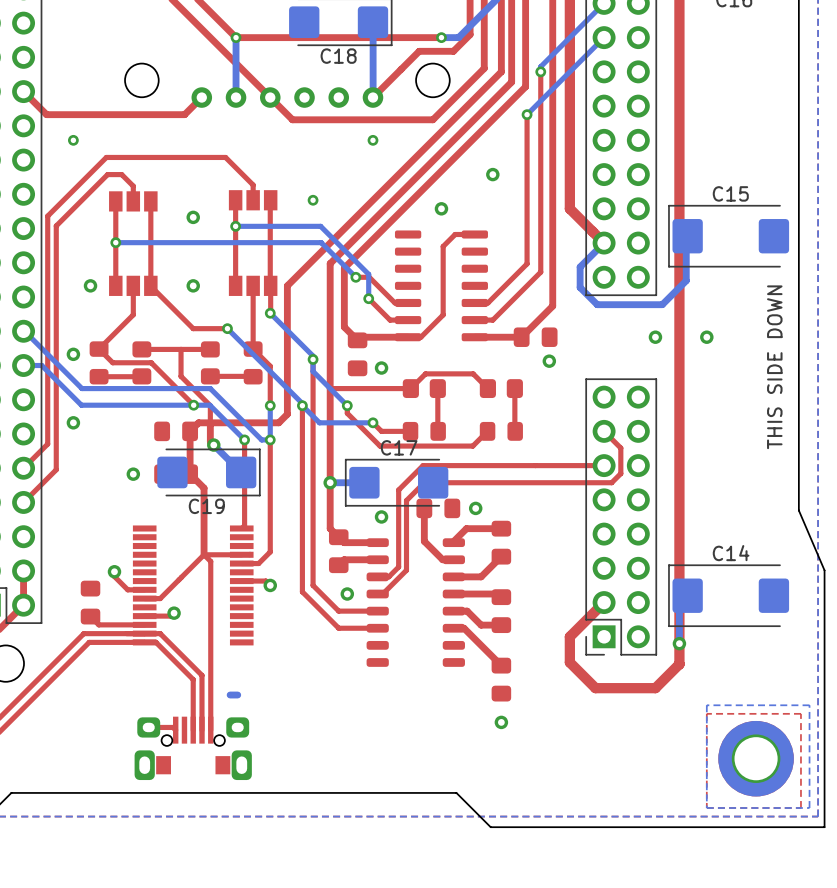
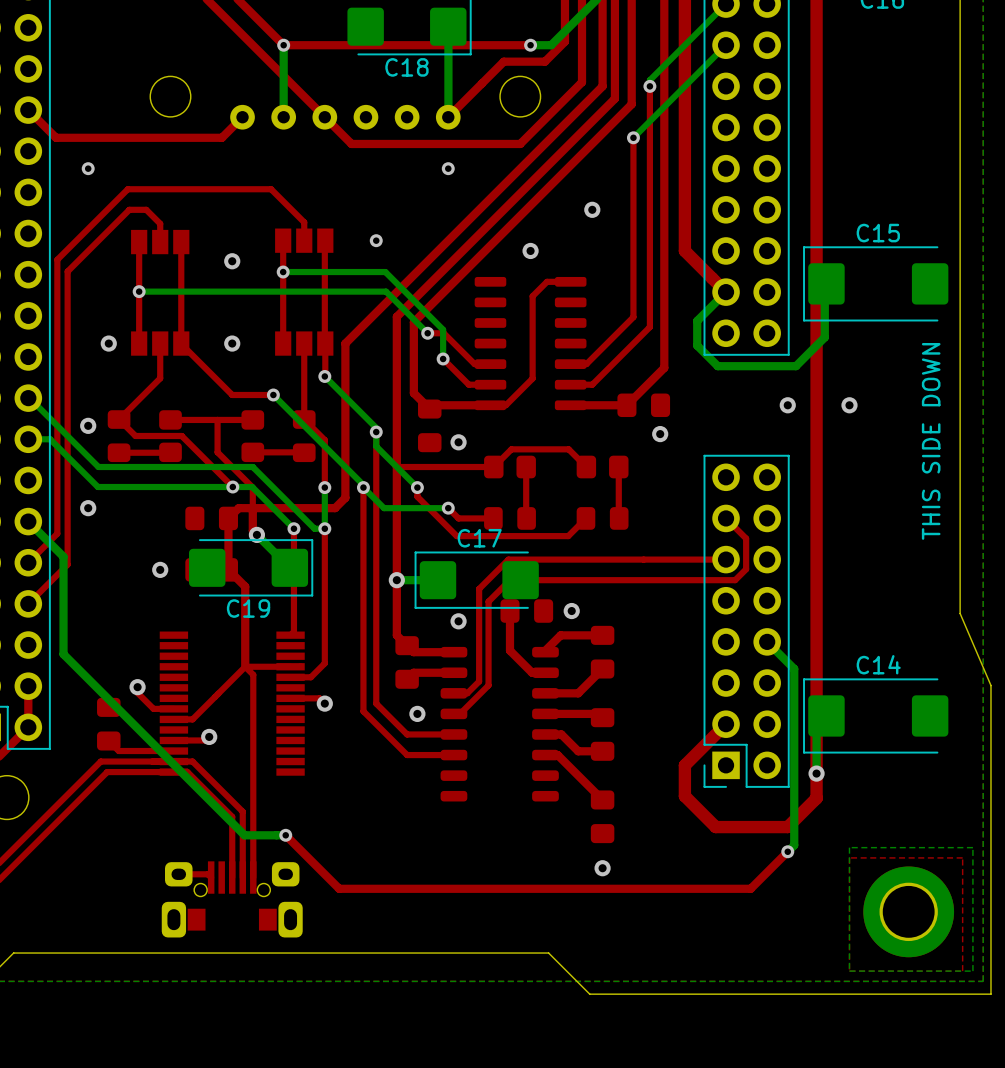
bottom track: none -> (28, 521) (63, 556) (63, 654) (244, 835) (276, 835)
bottom track: none -> (767, 641) (794, 668) (794, 845) (787, 851)
top track: none -> (285, 835) (339, 888) (750, 888) (787, 851)
via: none -> (285, 835)
via: none -> (787, 851)

